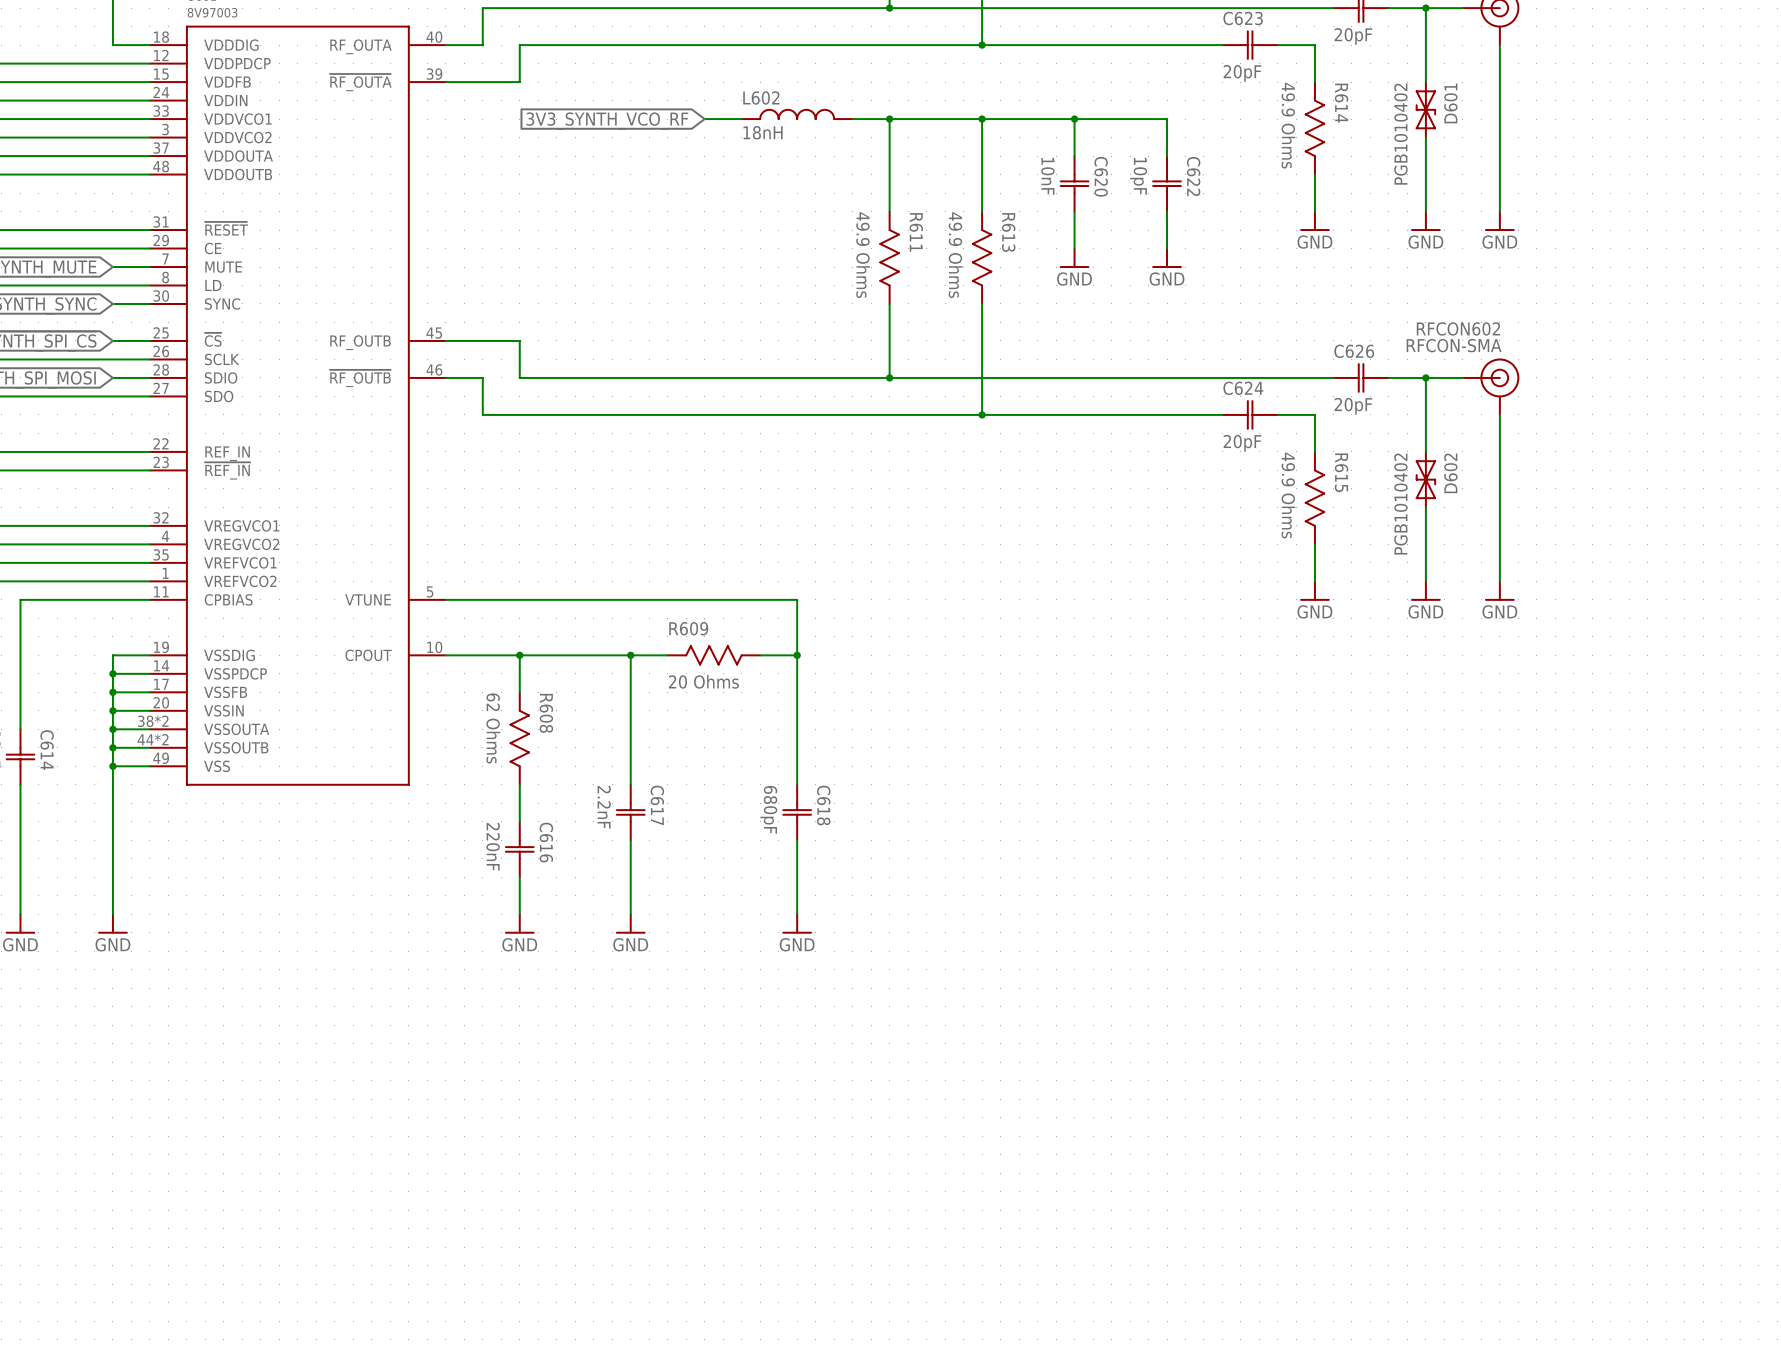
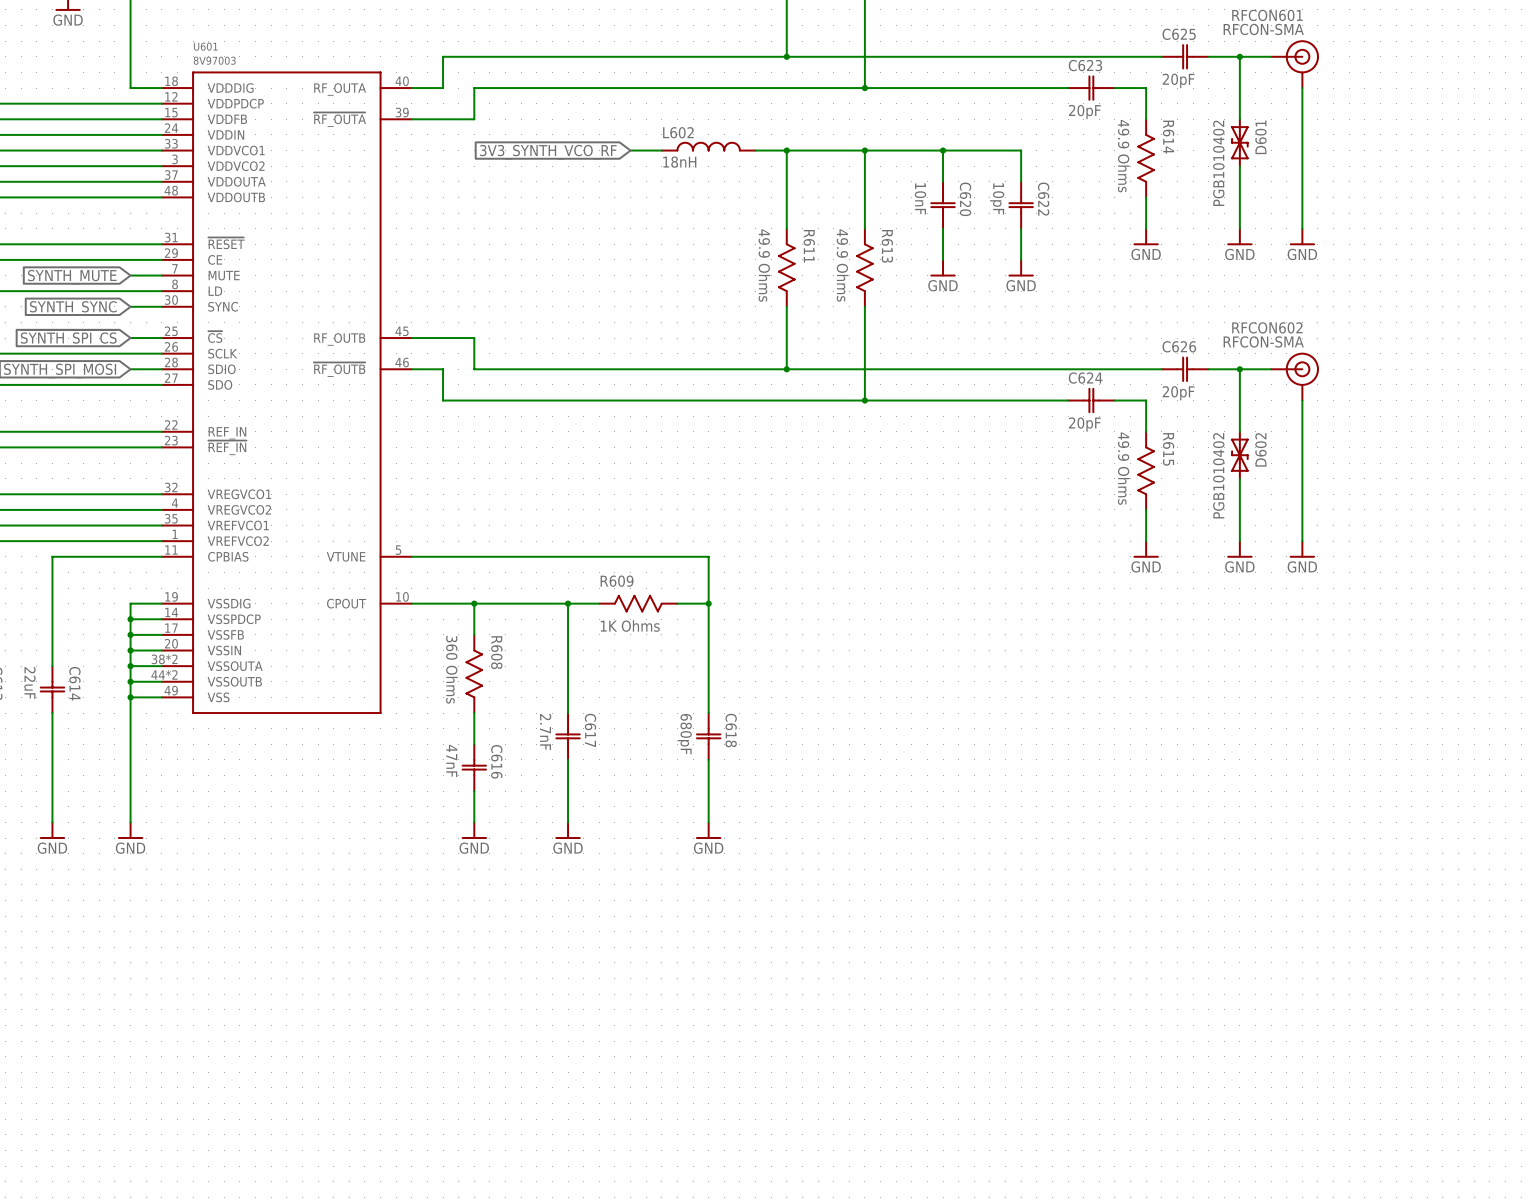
R609 value: 20 Ohms (703, 681) -> 1K Ohms (630, 626)
R608 value: 62 Ohms (493, 728) -> 360 Ohms (451, 669)
C617 value: 2.2nF (604, 807) -> 2.7nF (545, 732)
C616 value: 220nF (493, 846) -> 47nF (451, 760)

